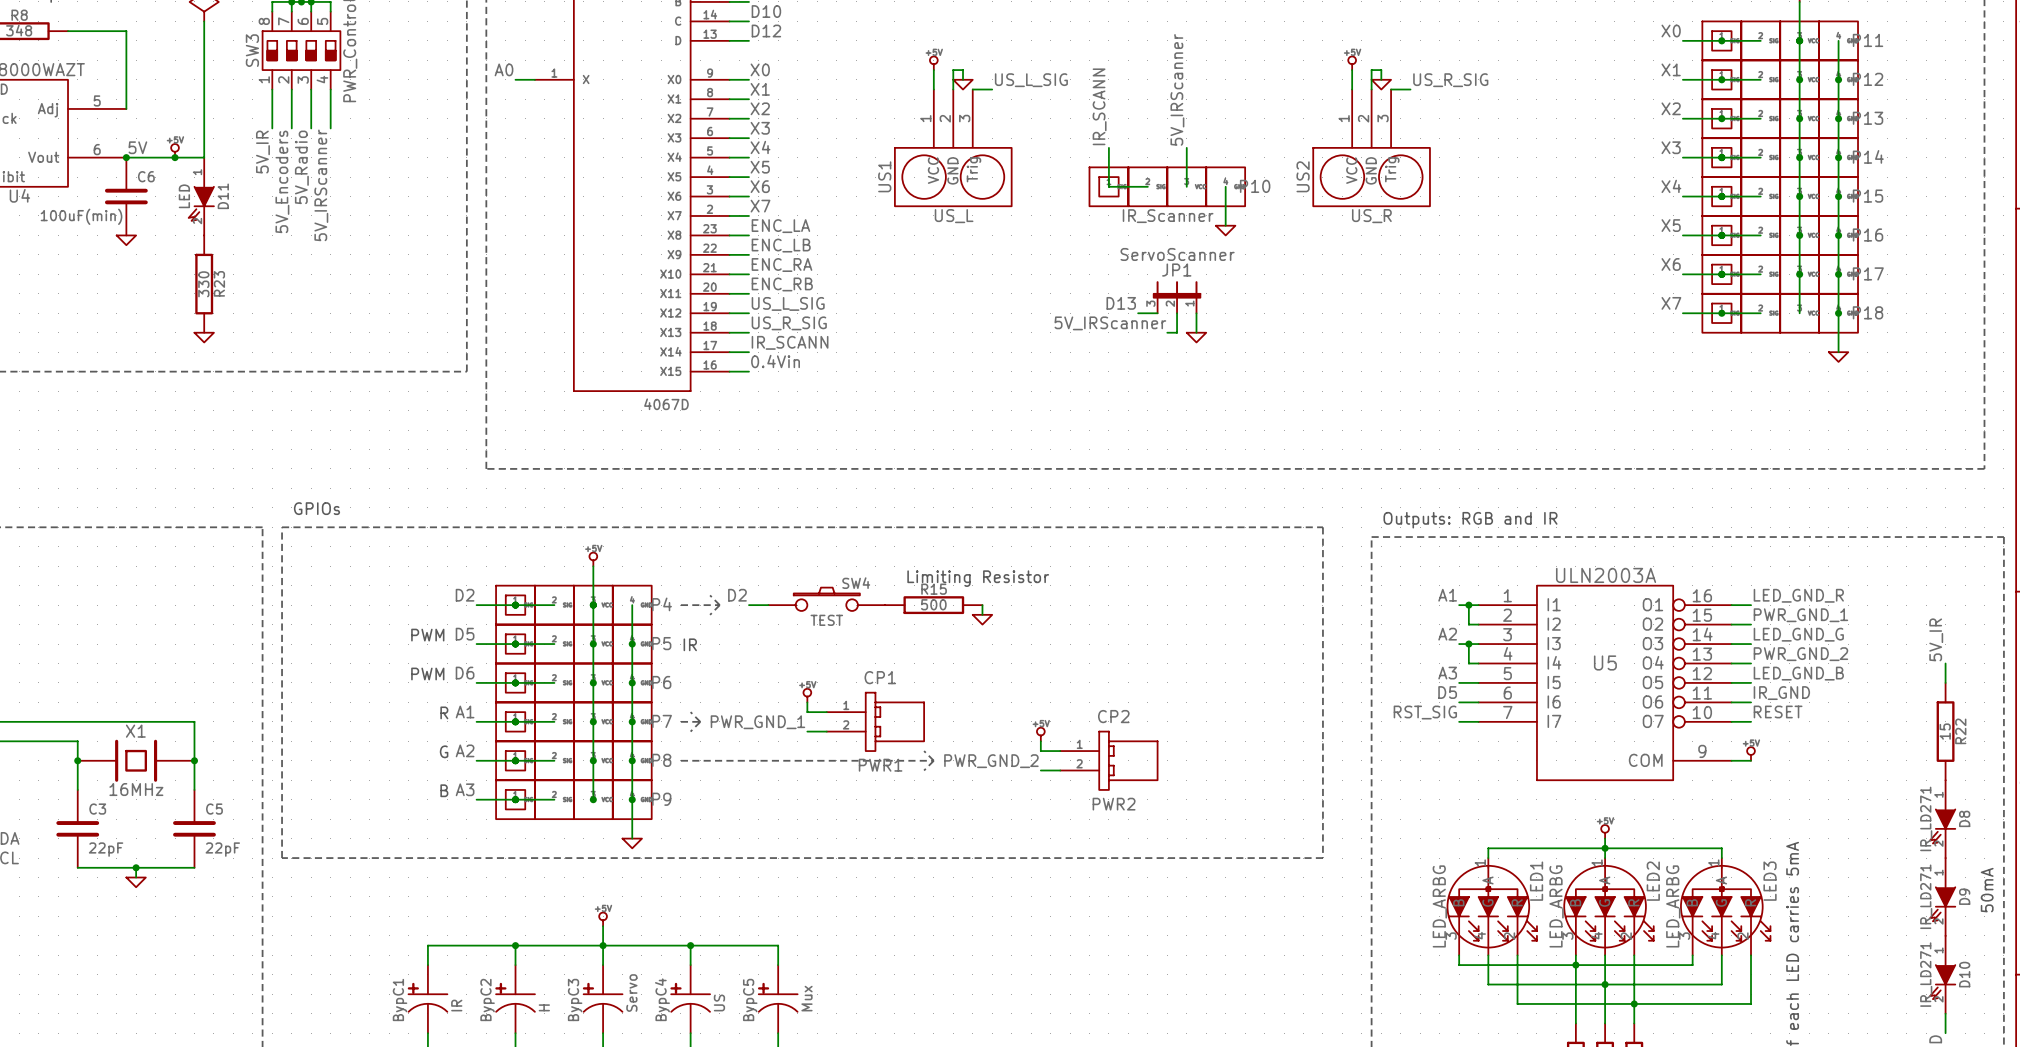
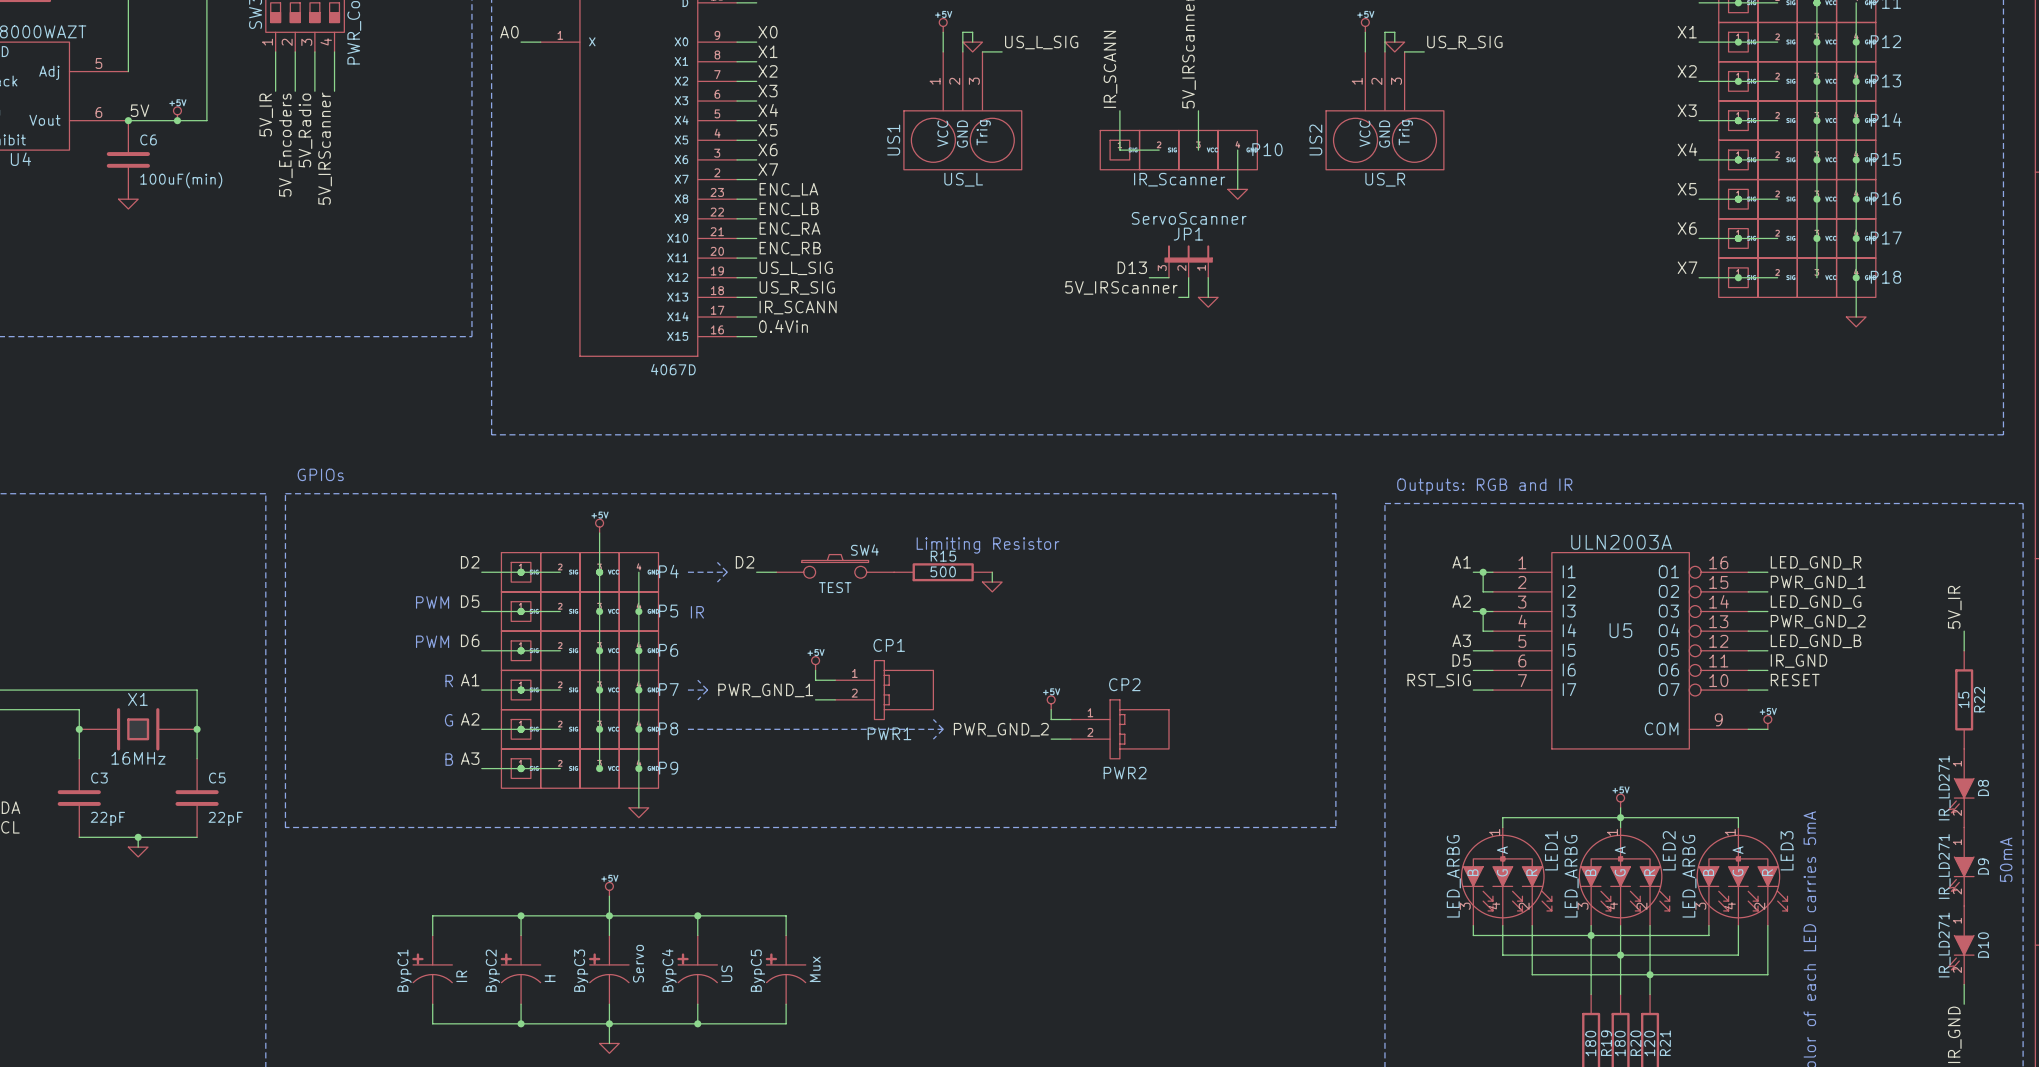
D11: LED (201, 196) -> none
C6 value position: 100uF(min) (81, 216) -> 100uF(min) (181, 180)
R23: 330 (204, 284) -> none
power symbol: (204, 337) -> none

